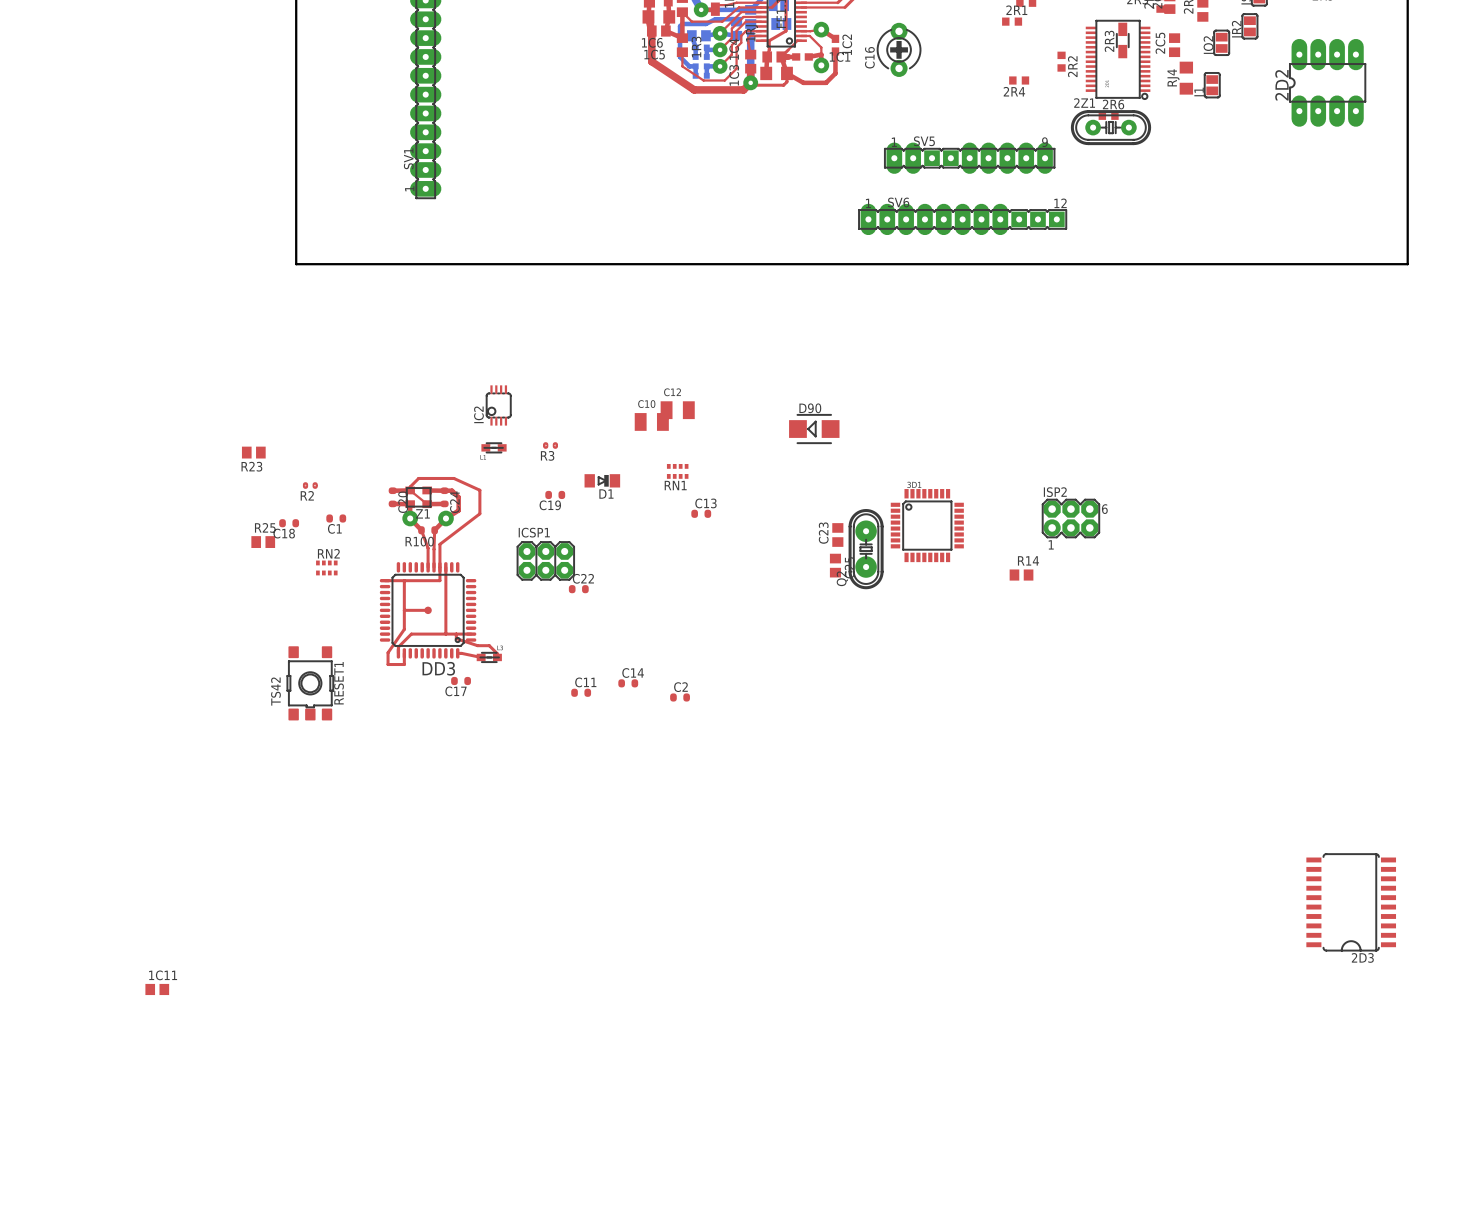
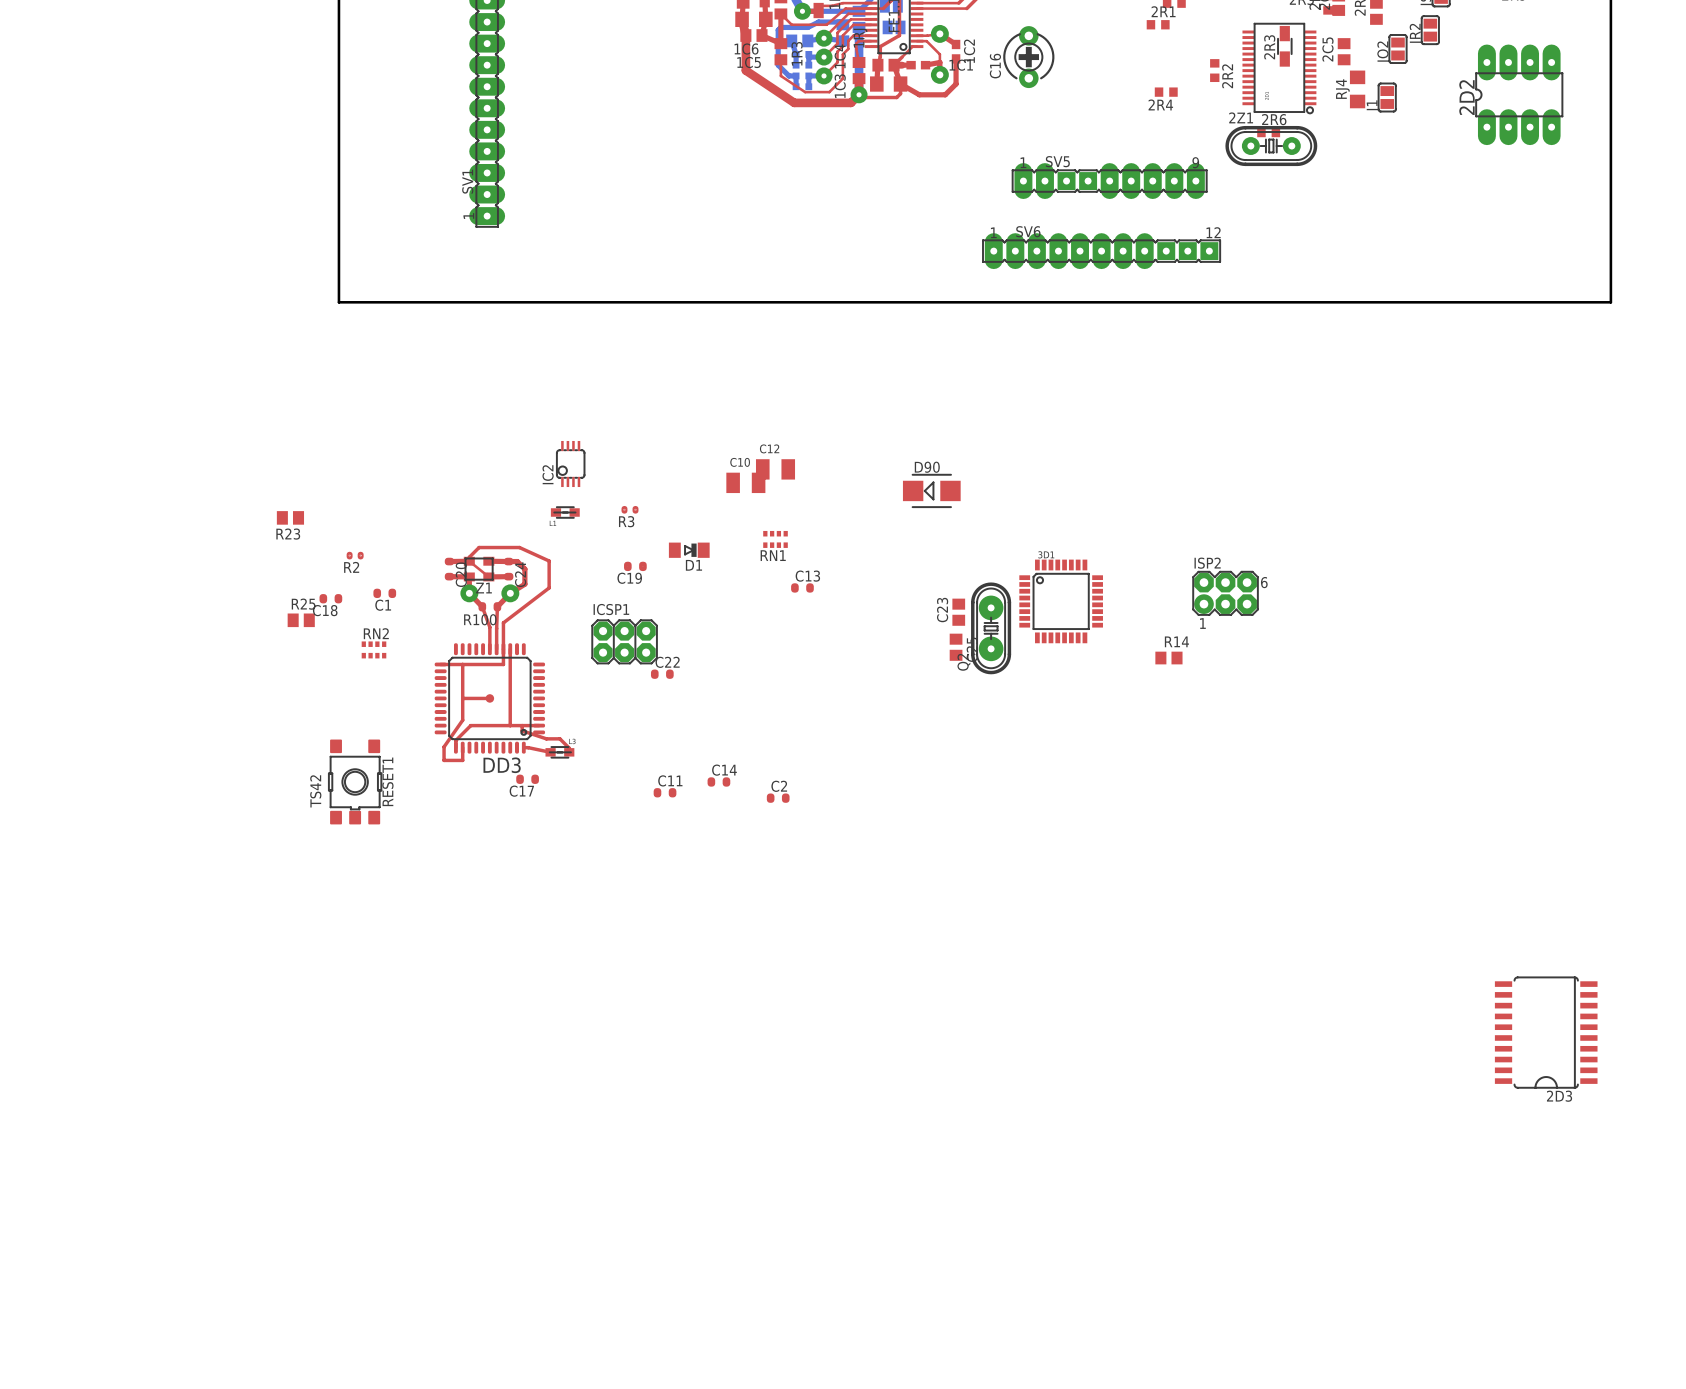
1C11: (157, 989) -> none

